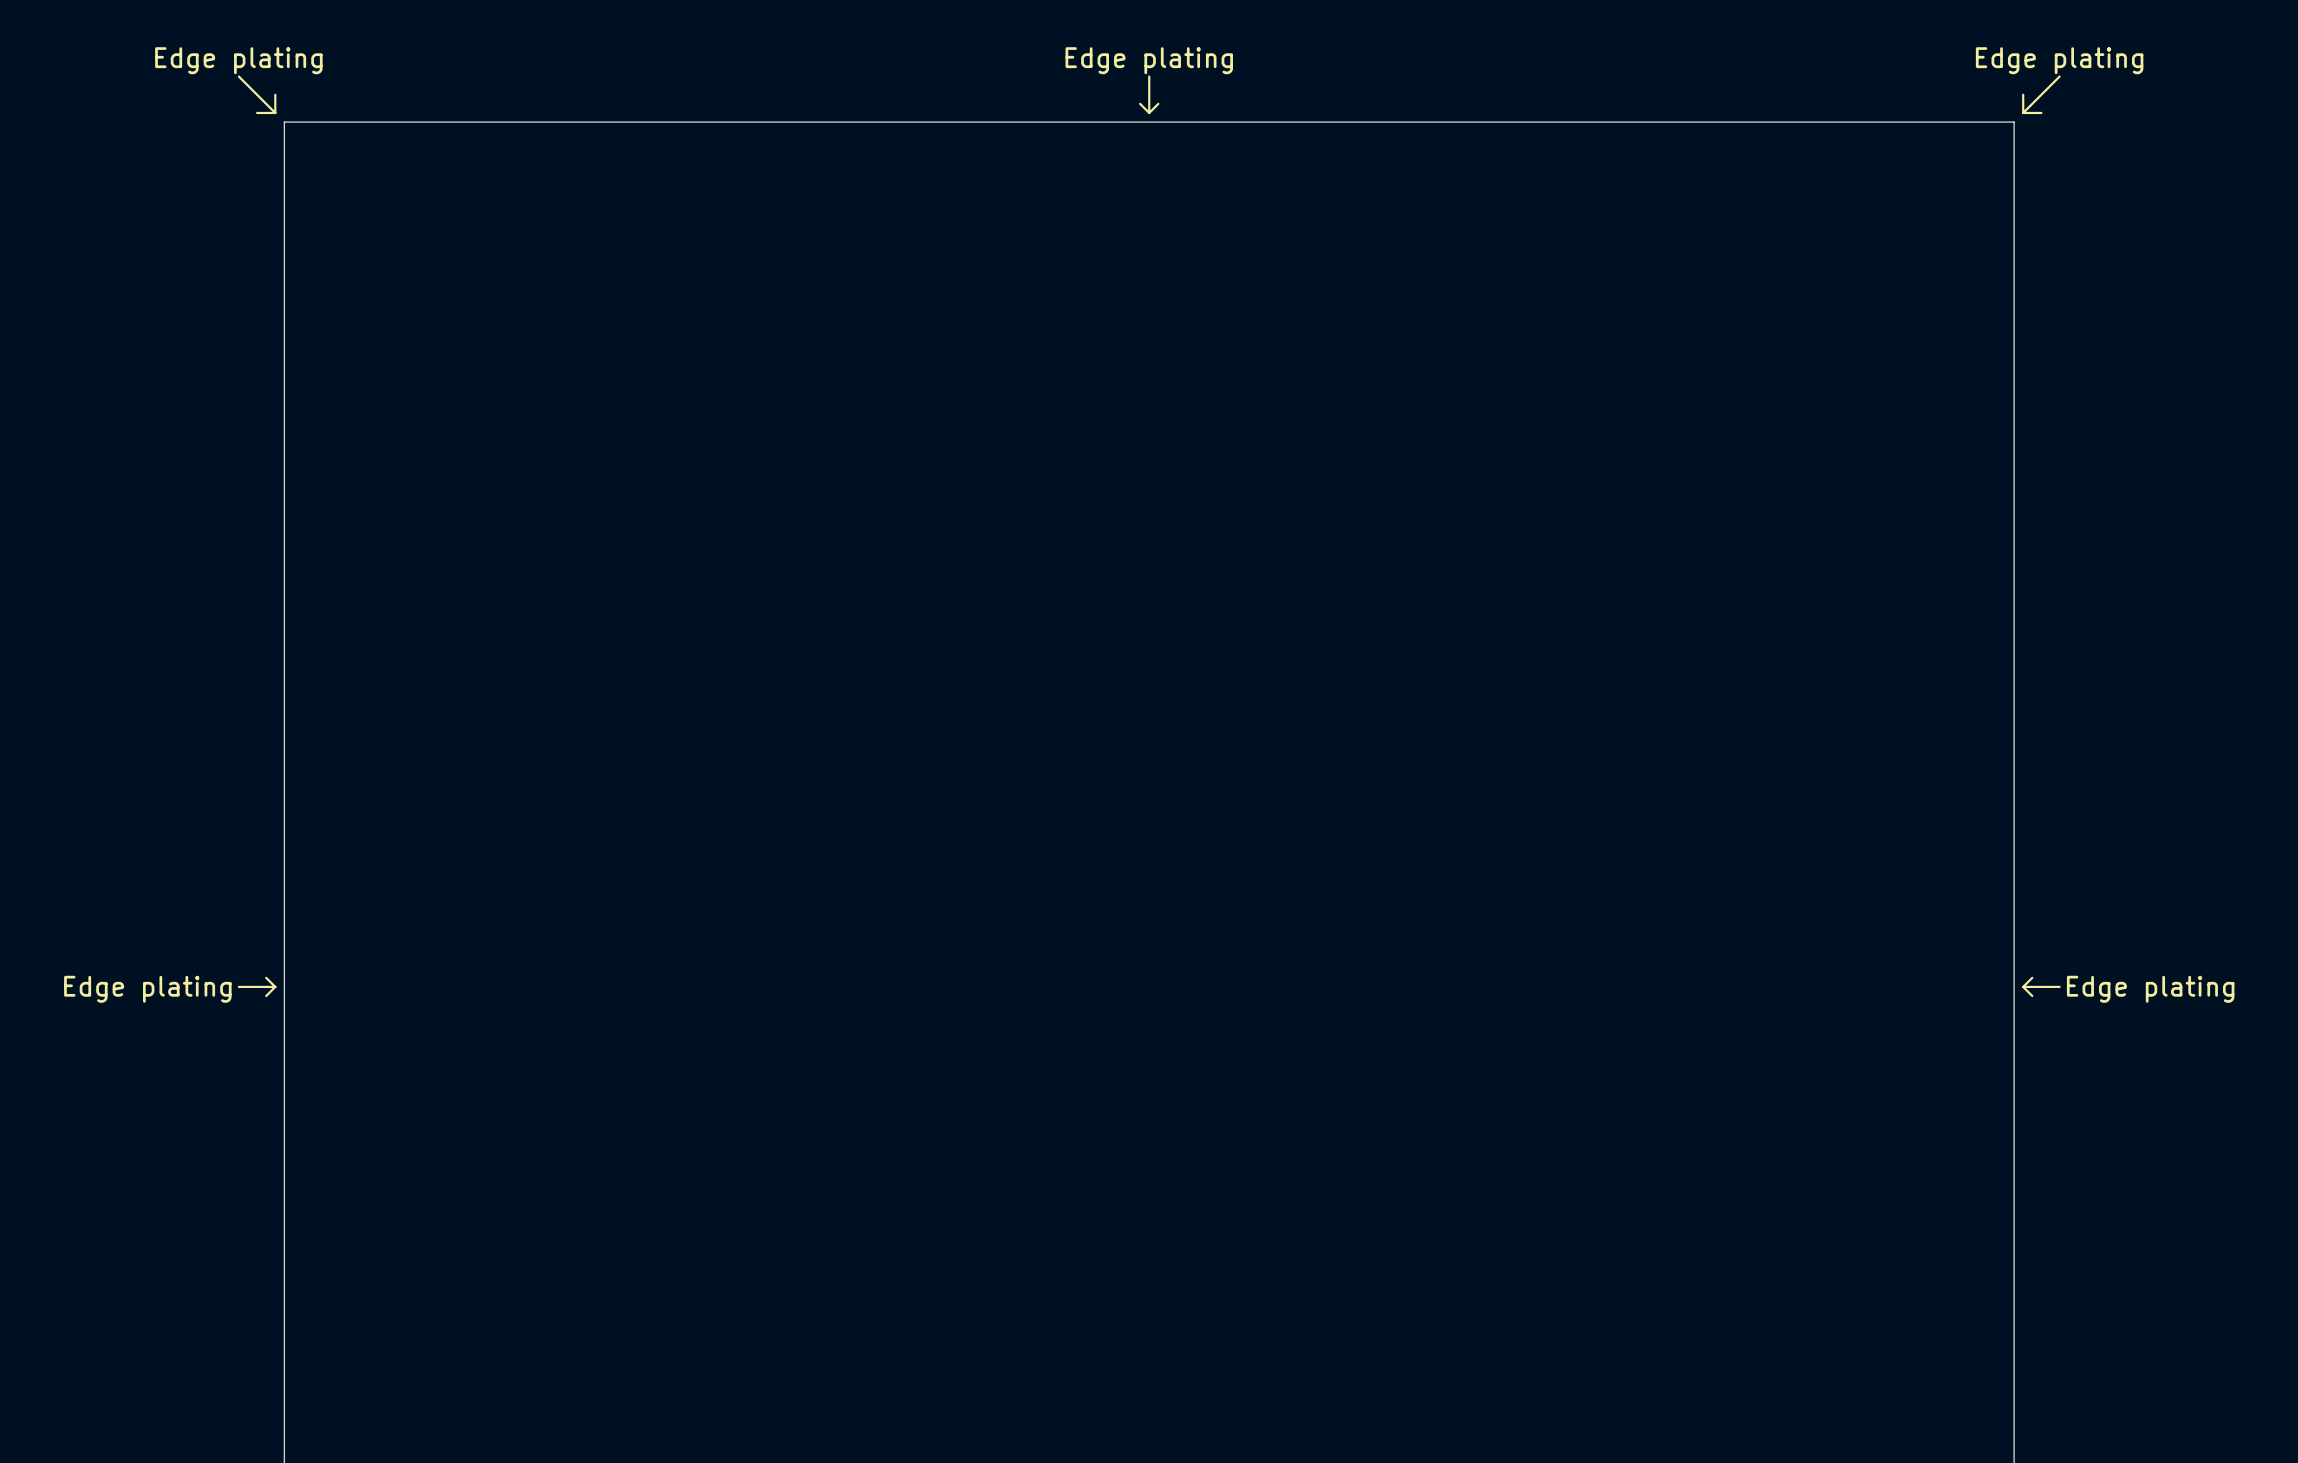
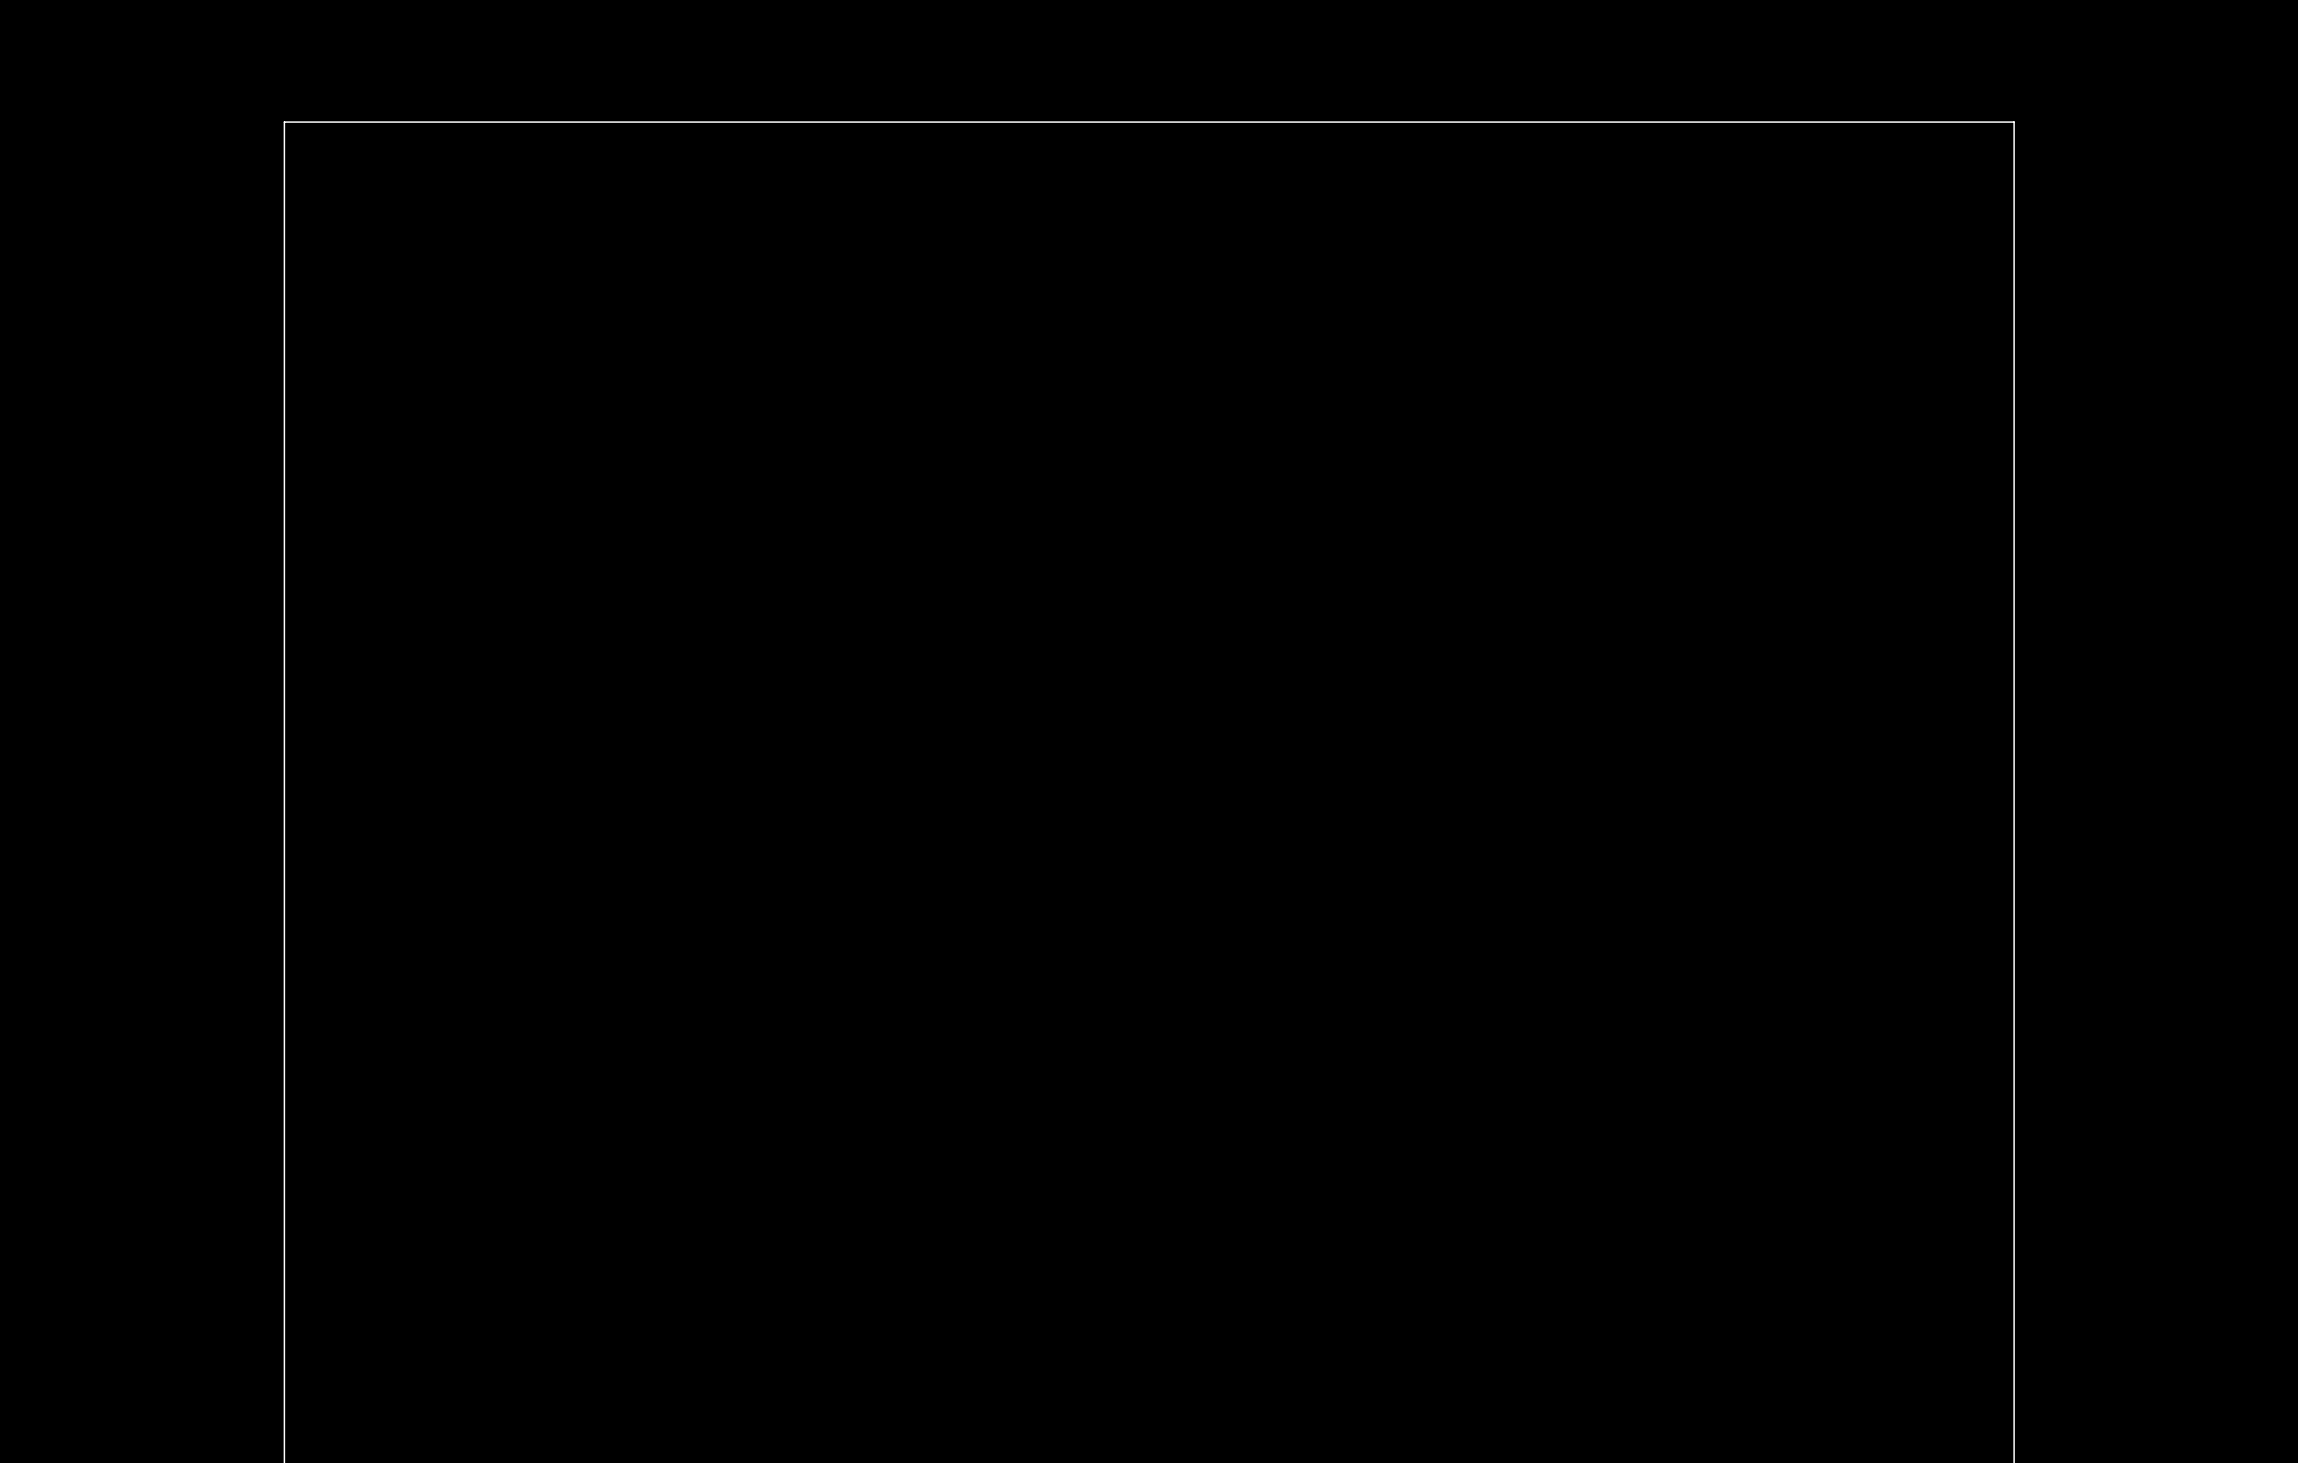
text: Edge plating (238, 60) -> none
text: Edge plating (1149, 60) -> none
text: Edge plating (2059, 60) -> none
line: (238, 76) (275, 112) -> none
line: (1149, 76) (1149, 112) -> none
line: (2059, 76) (2023, 112) -> none
line: (275, 94) (275, 112) -> none
line: (2023, 94) (2023, 112) -> none
line: (1140, 103) (1149, 112) -> none
line: (1158, 103) (1149, 112) -> none
line: (257, 112) (275, 112) -> none
line: (2023, 112) (2041, 112) -> none
line: (266, 977) (275, 986) -> none
line: (2032, 977) (2023, 986) -> none
line: (238, 986) (275, 986) -> none
line: (275, 986) (266, 996) -> none
line: (2023, 986) (2059, 986) -> none
line: (2023, 986) (2032, 996) -> none
text: Edge plating (147, 989) -> none
text: Edge plating (2150, 989) -> none

